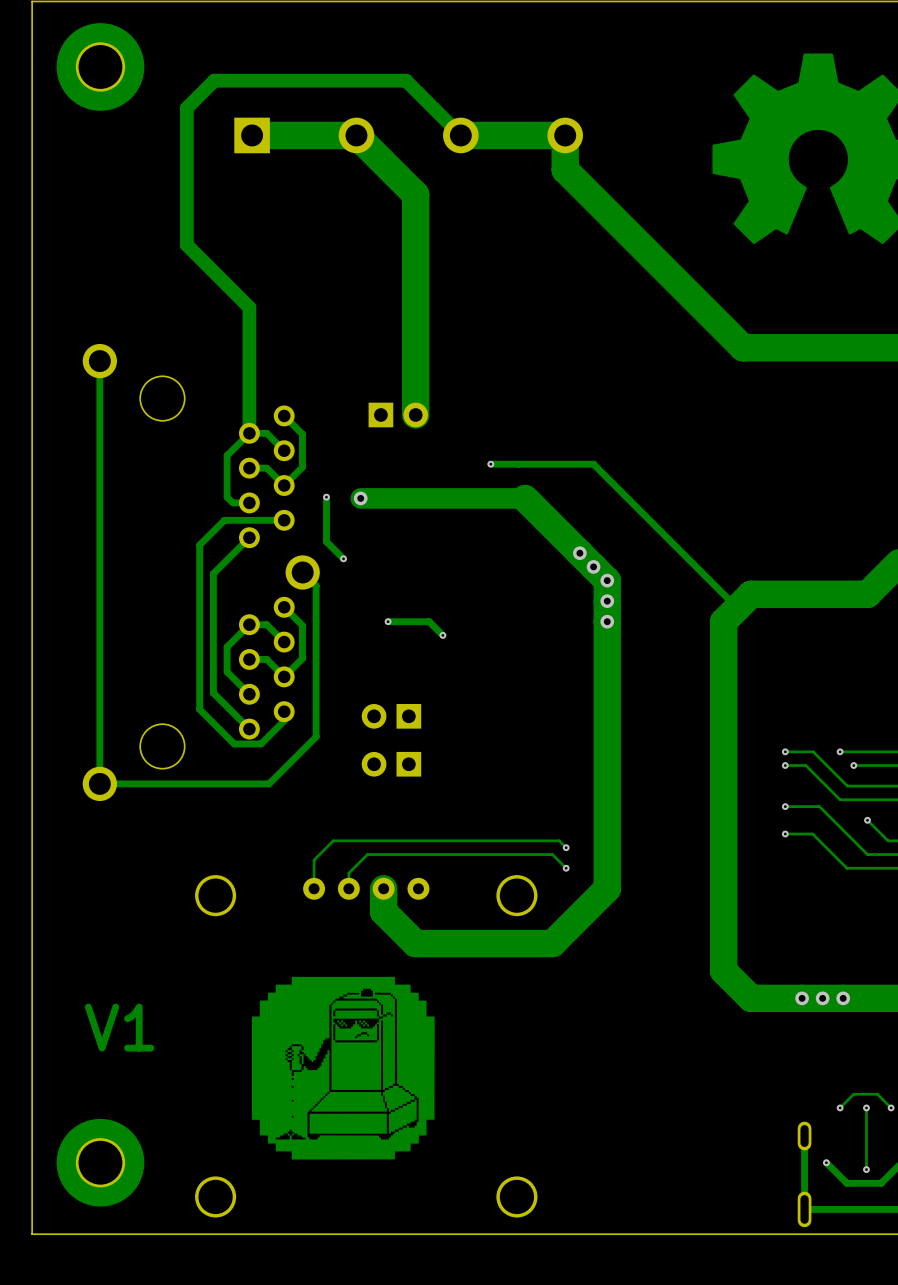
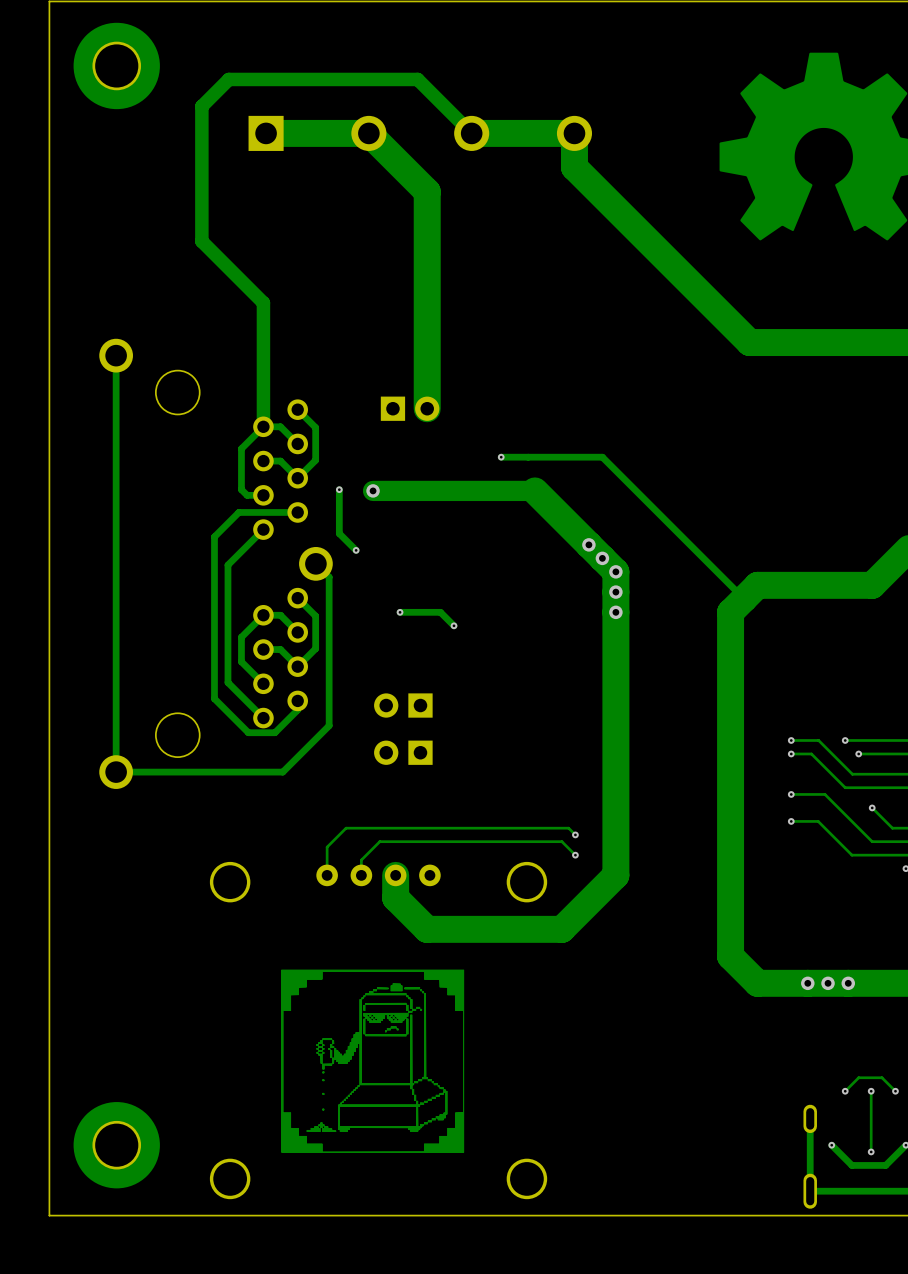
drawing: [252, 976, 435, 1160] -> none
drawing: none -> [281, 969, 465, 1153]
text: V1 (119, 1027) -> none

